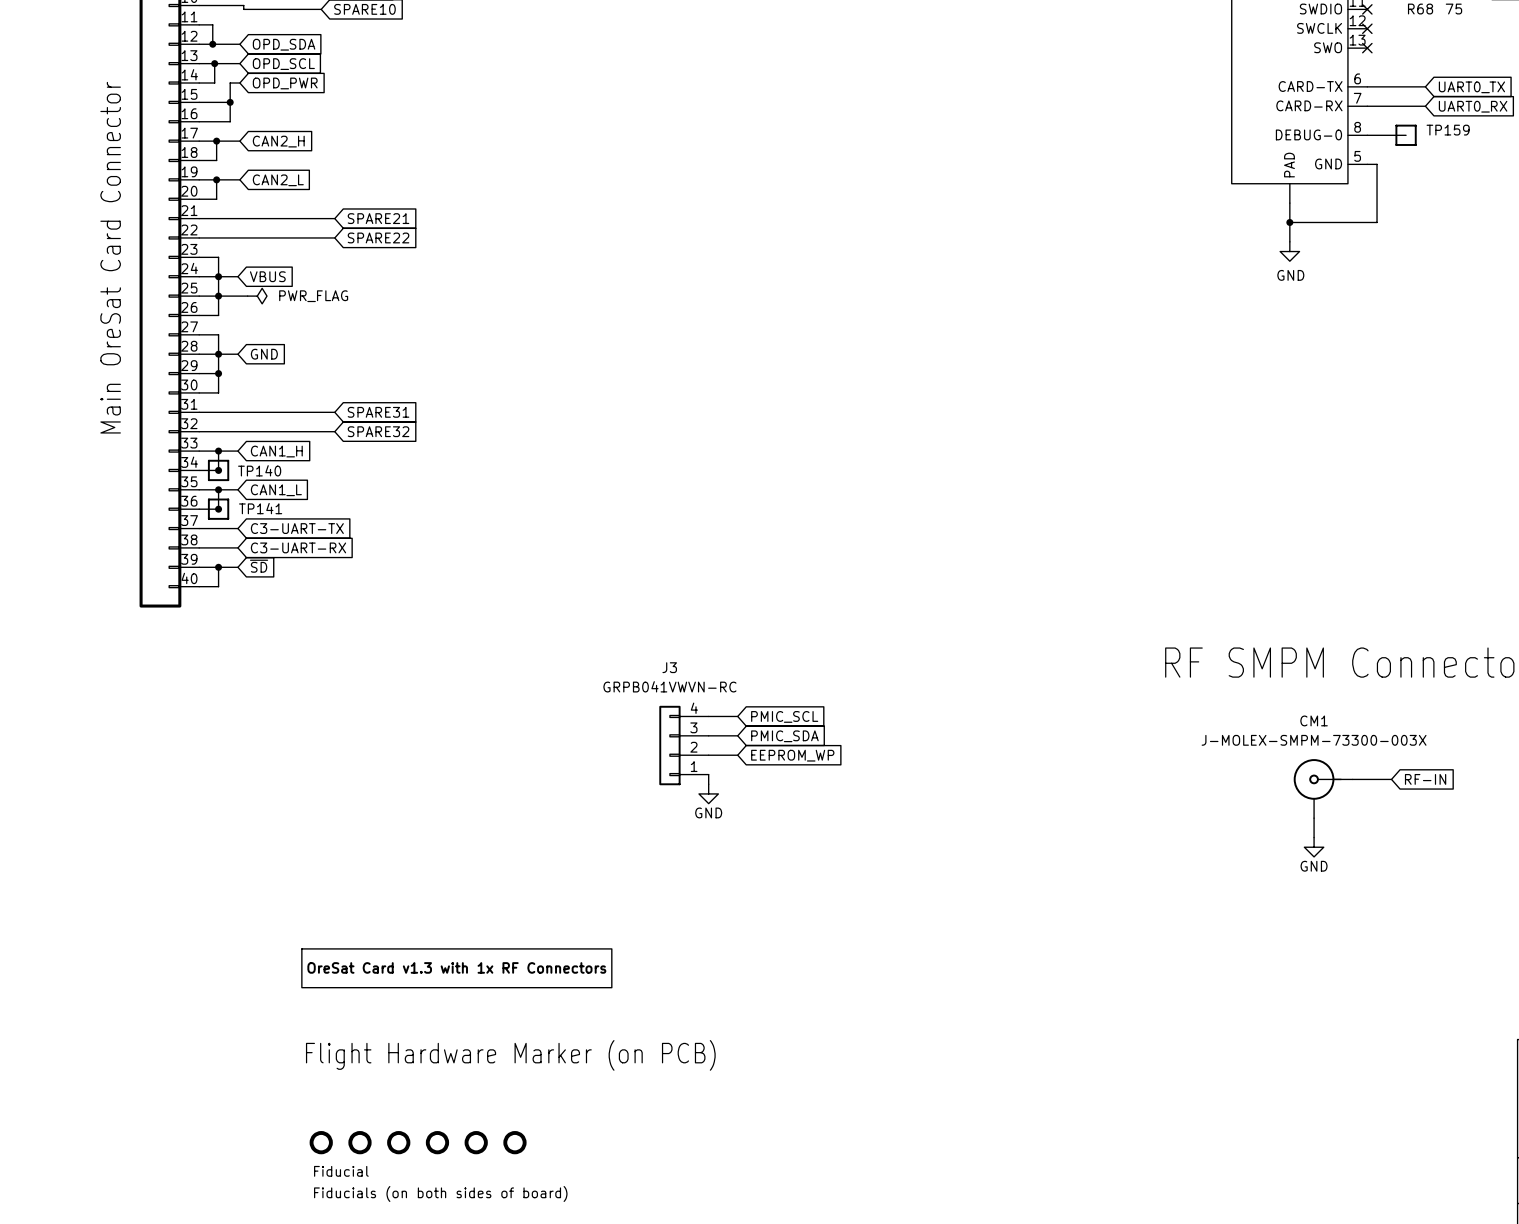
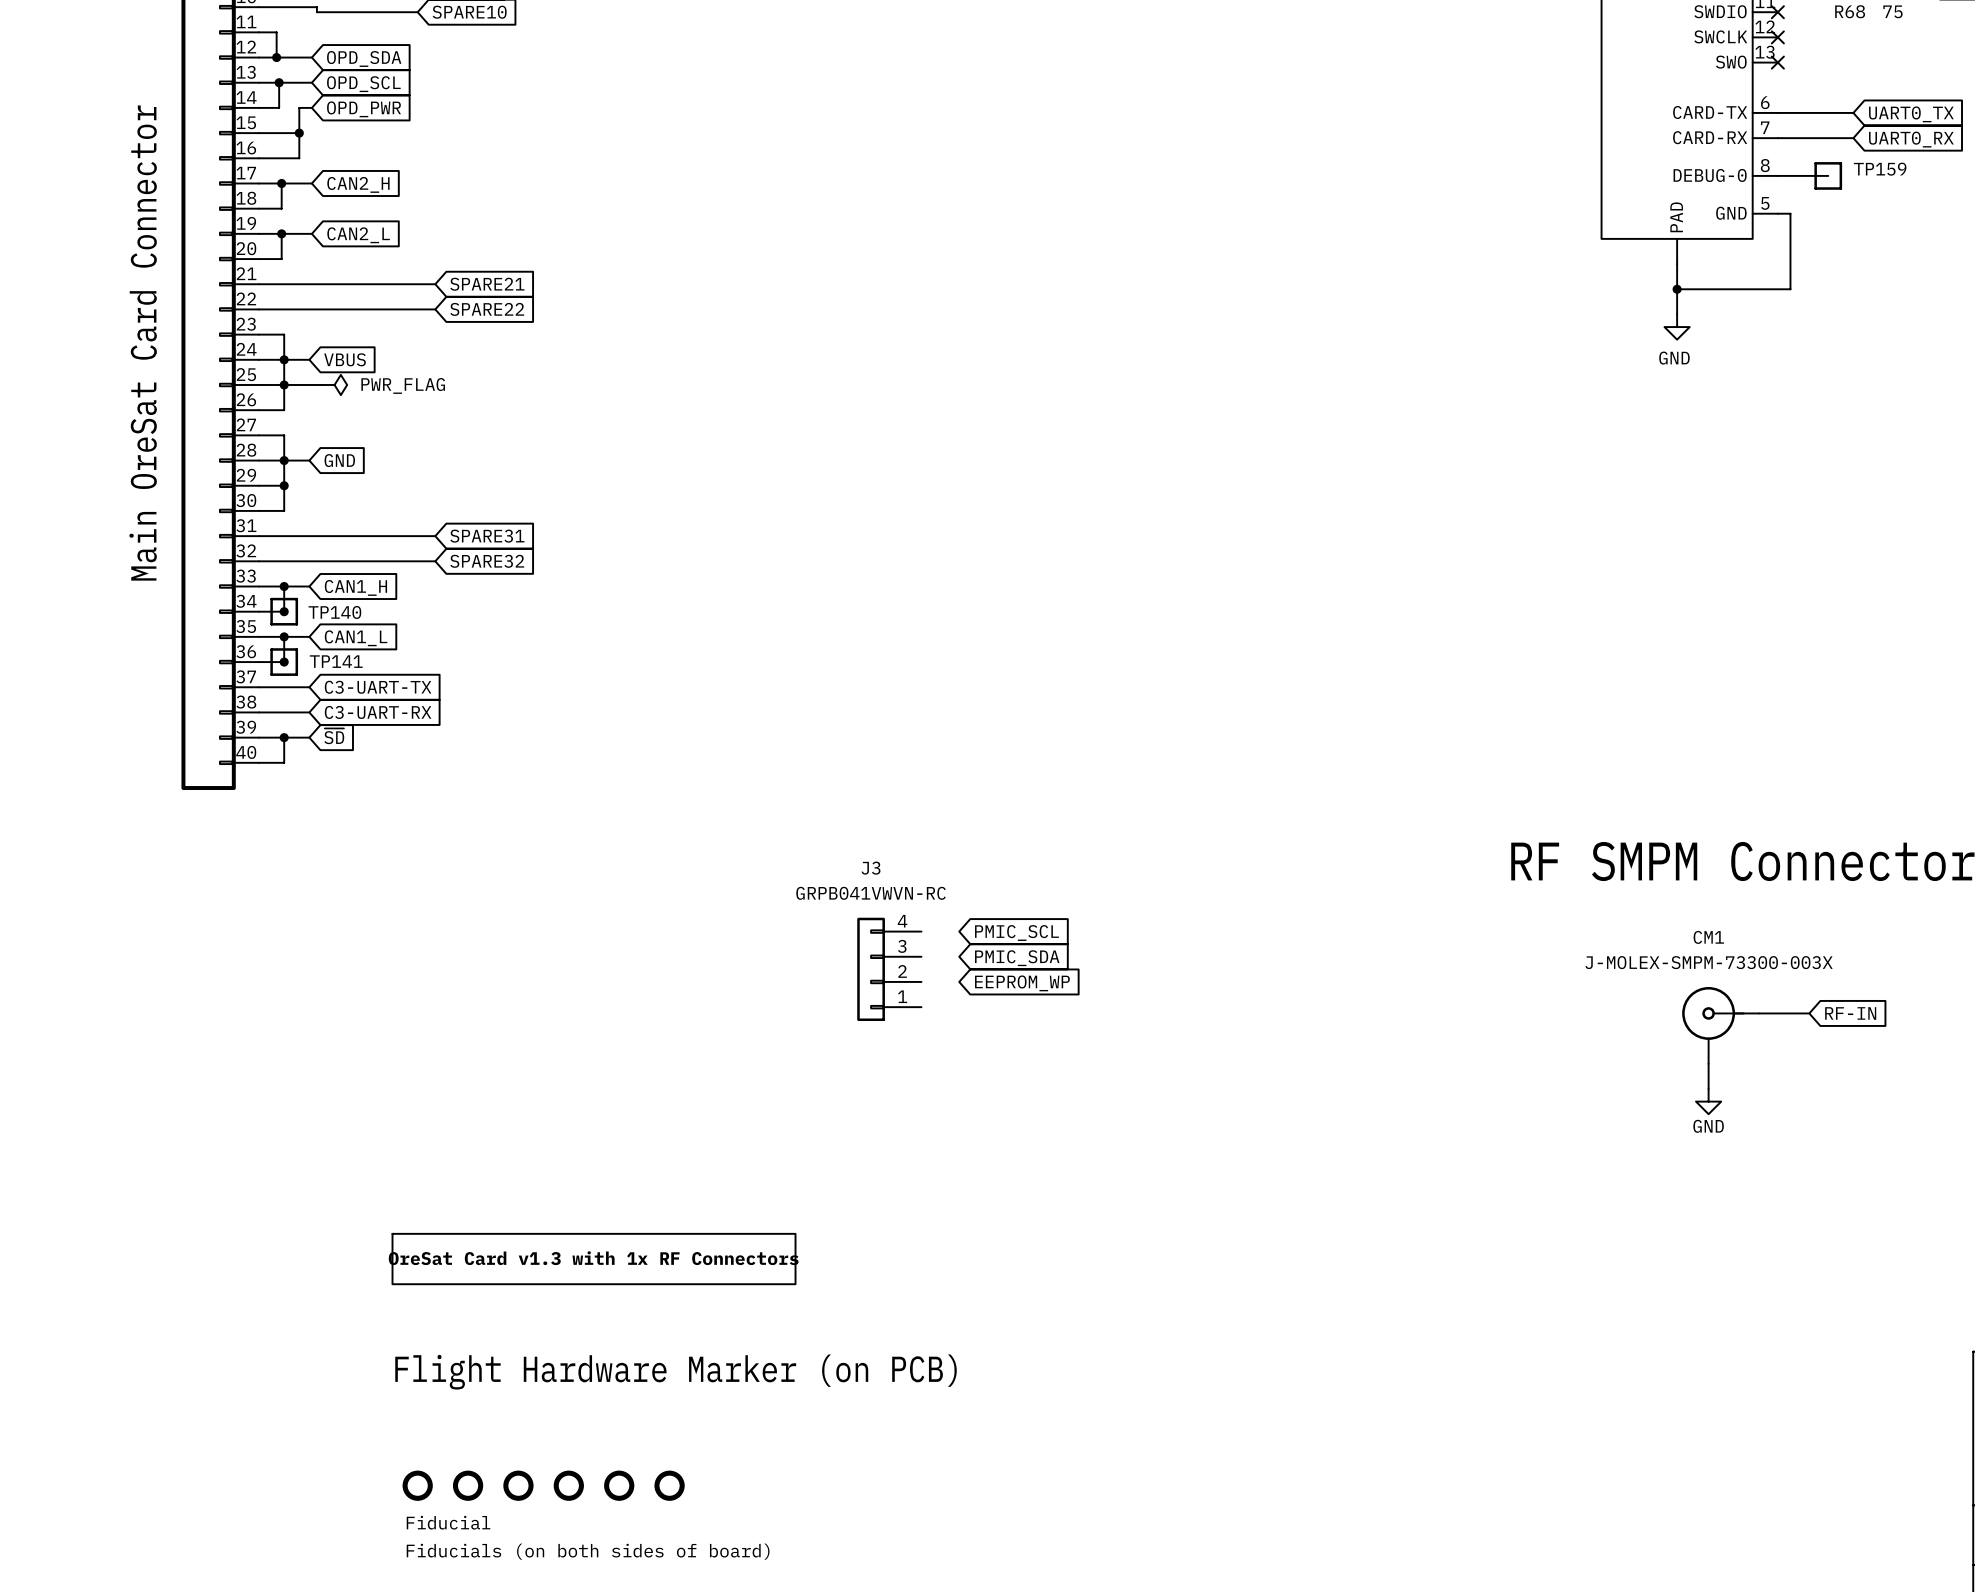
wire: (708, 716) (737, 716) -> none
wire: (708, 735) (737, 735) -> none
wire: (708, 755) (737, 755) -> none
wire: (708, 774) (708, 784) -> none
power symbol: GND (708, 793) -> none

